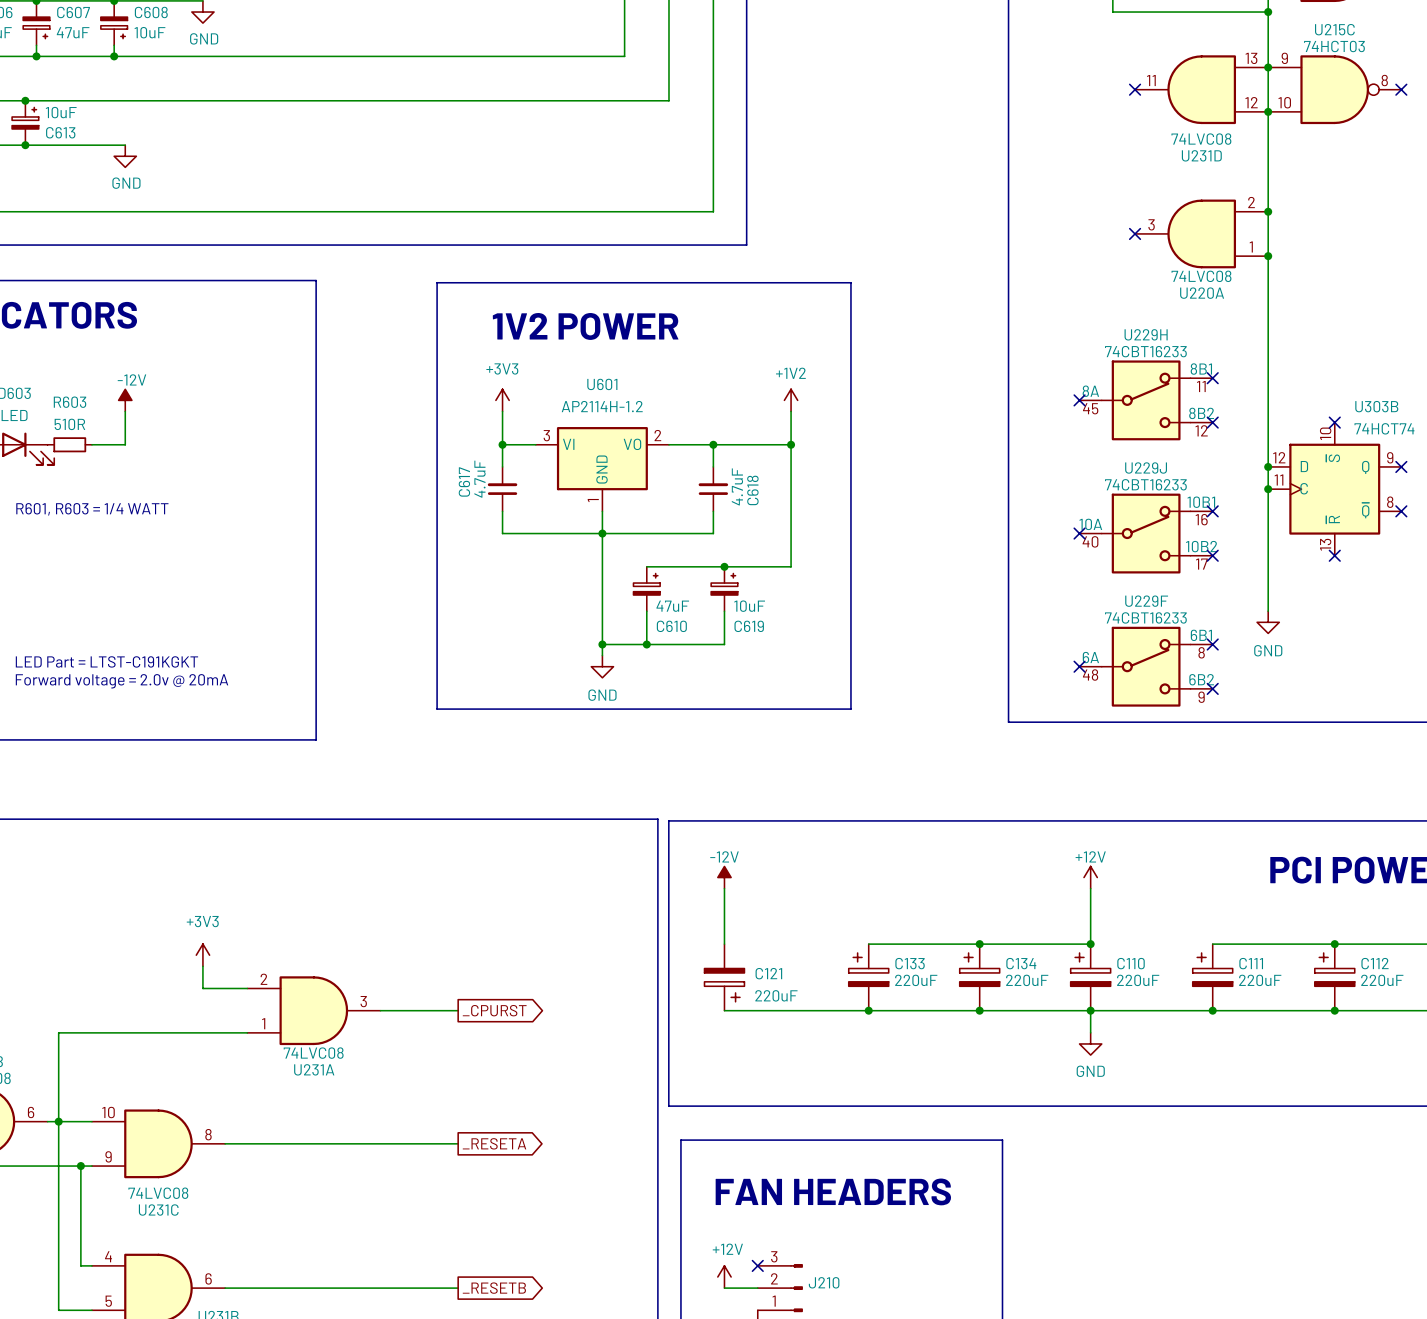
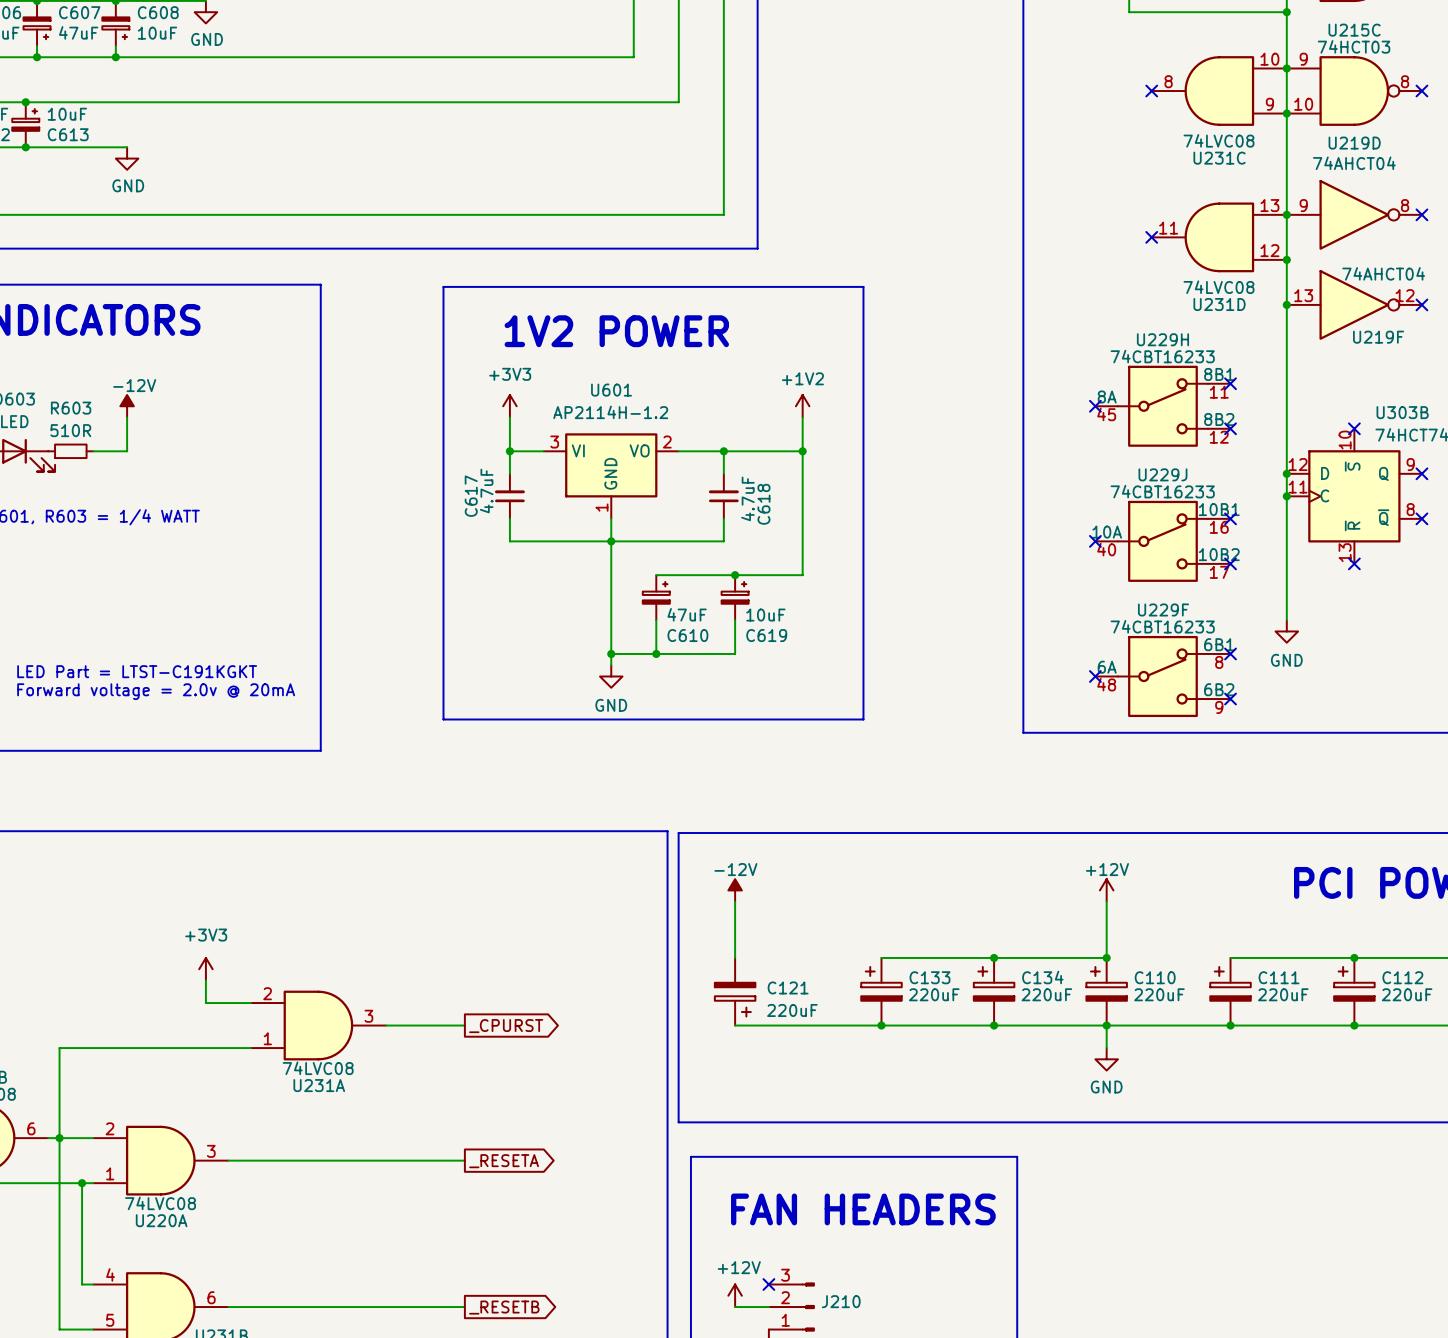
U231D position: (1201, 89) -> (1219, 237)
U219D: none -> 74AHCT04 (1354, 214)
no-connect mark: none -> (1421, 214)
U220A flip: as is (1201, 233) -> left-right (160, 1160)
U220A position: (1201, 233) -> (160, 1160)
junction: none -> (1286, 304)
U219F: none -> 74AHCT04 (1354, 304)
no-connect mark: none -> (1421, 304)
U231C flip: as is (158, 1143) -> left-right (1219, 91)
U231C position: (158, 1143) -> (1219, 91)

